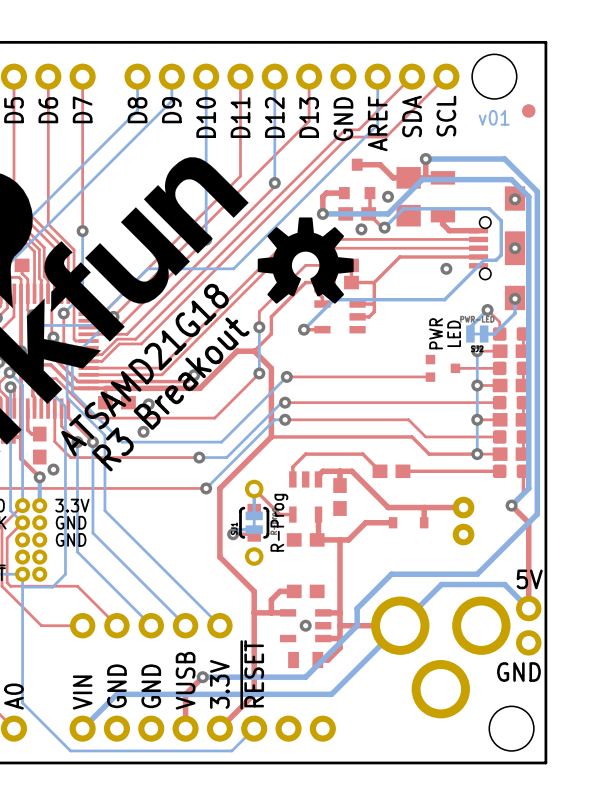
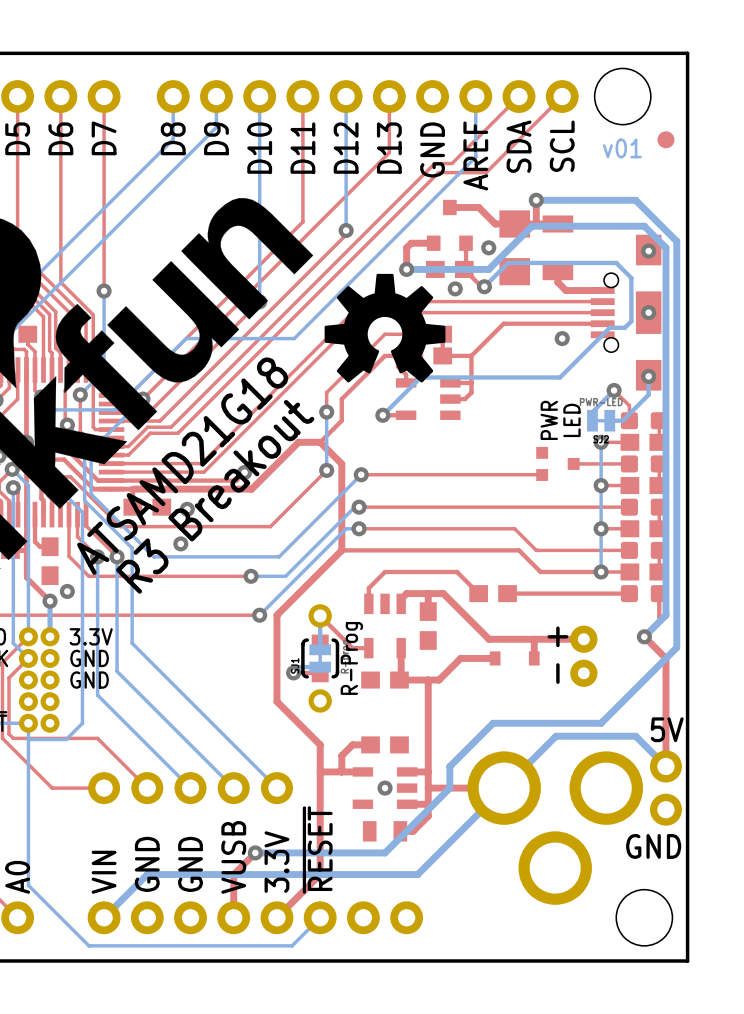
line: none -> (557, 628) (557, 645)
line: none -> (566, 636) (549, 636)
line: none -> (557, 664) (557, 682)

